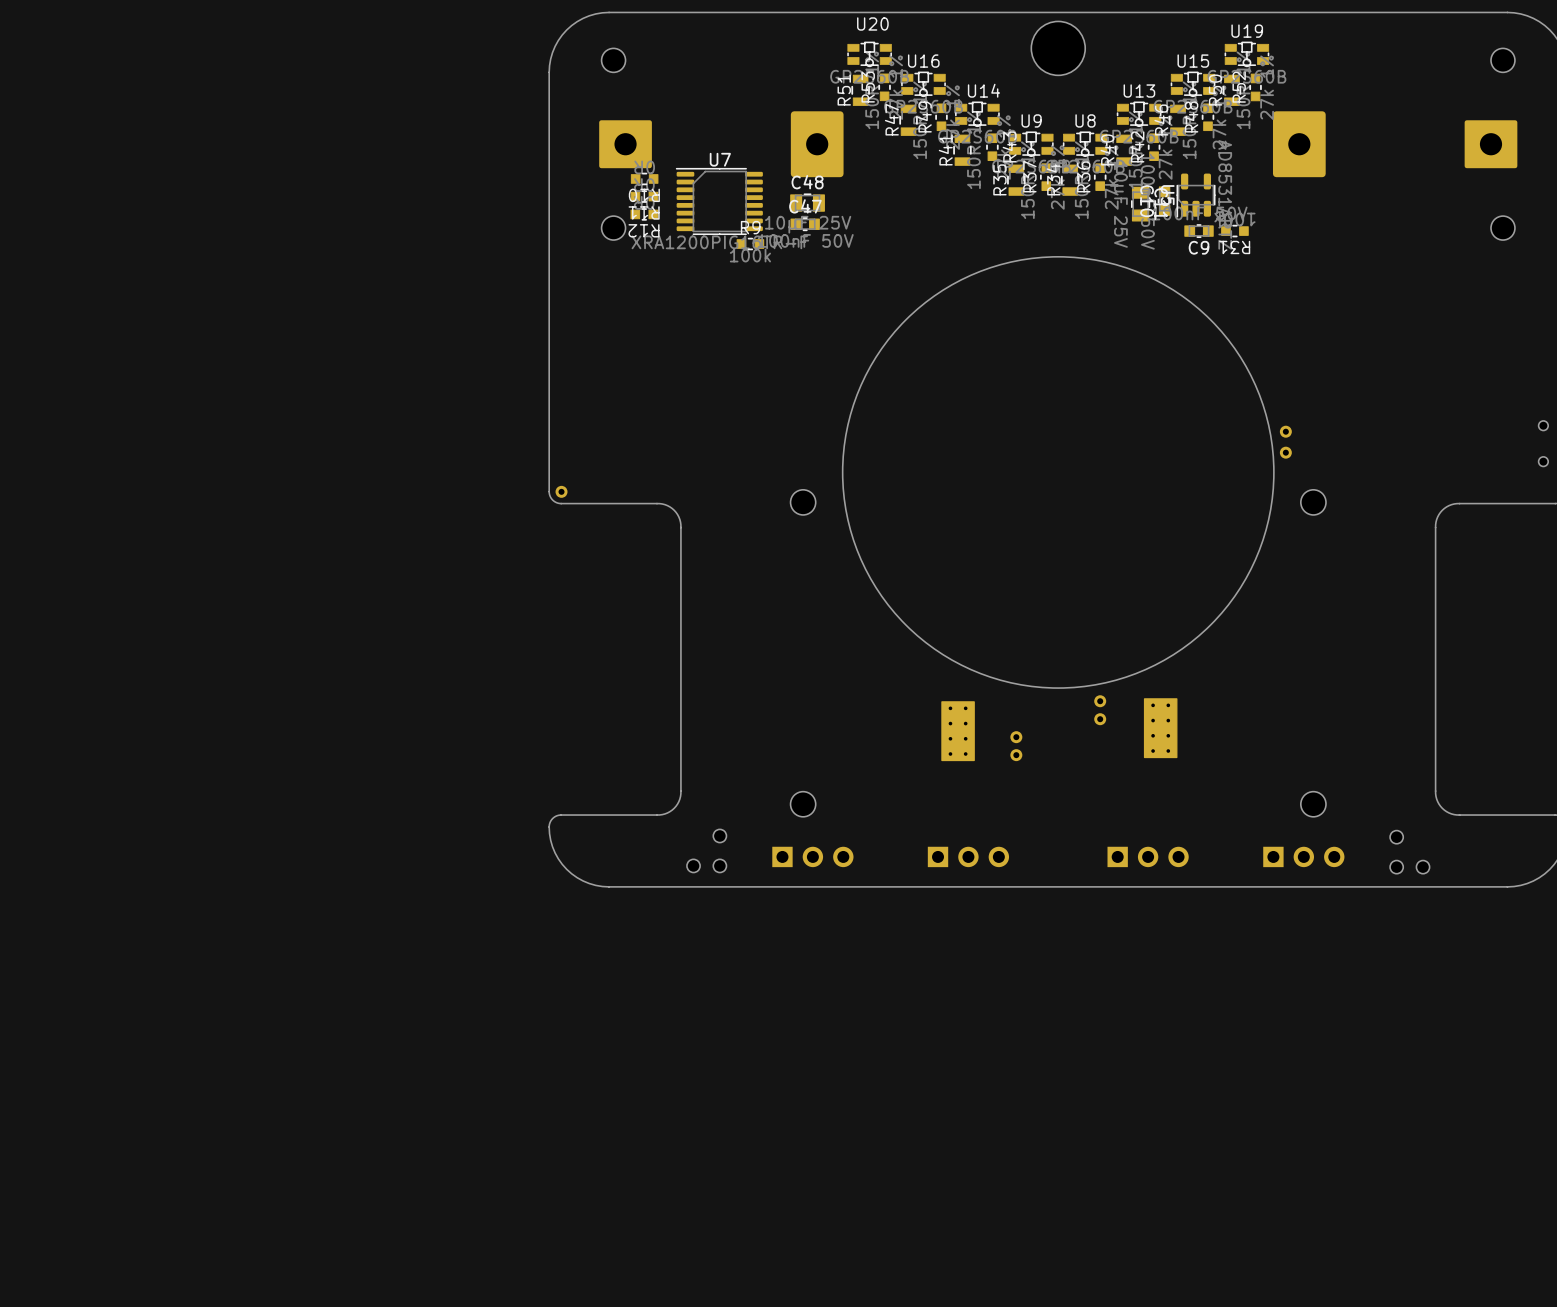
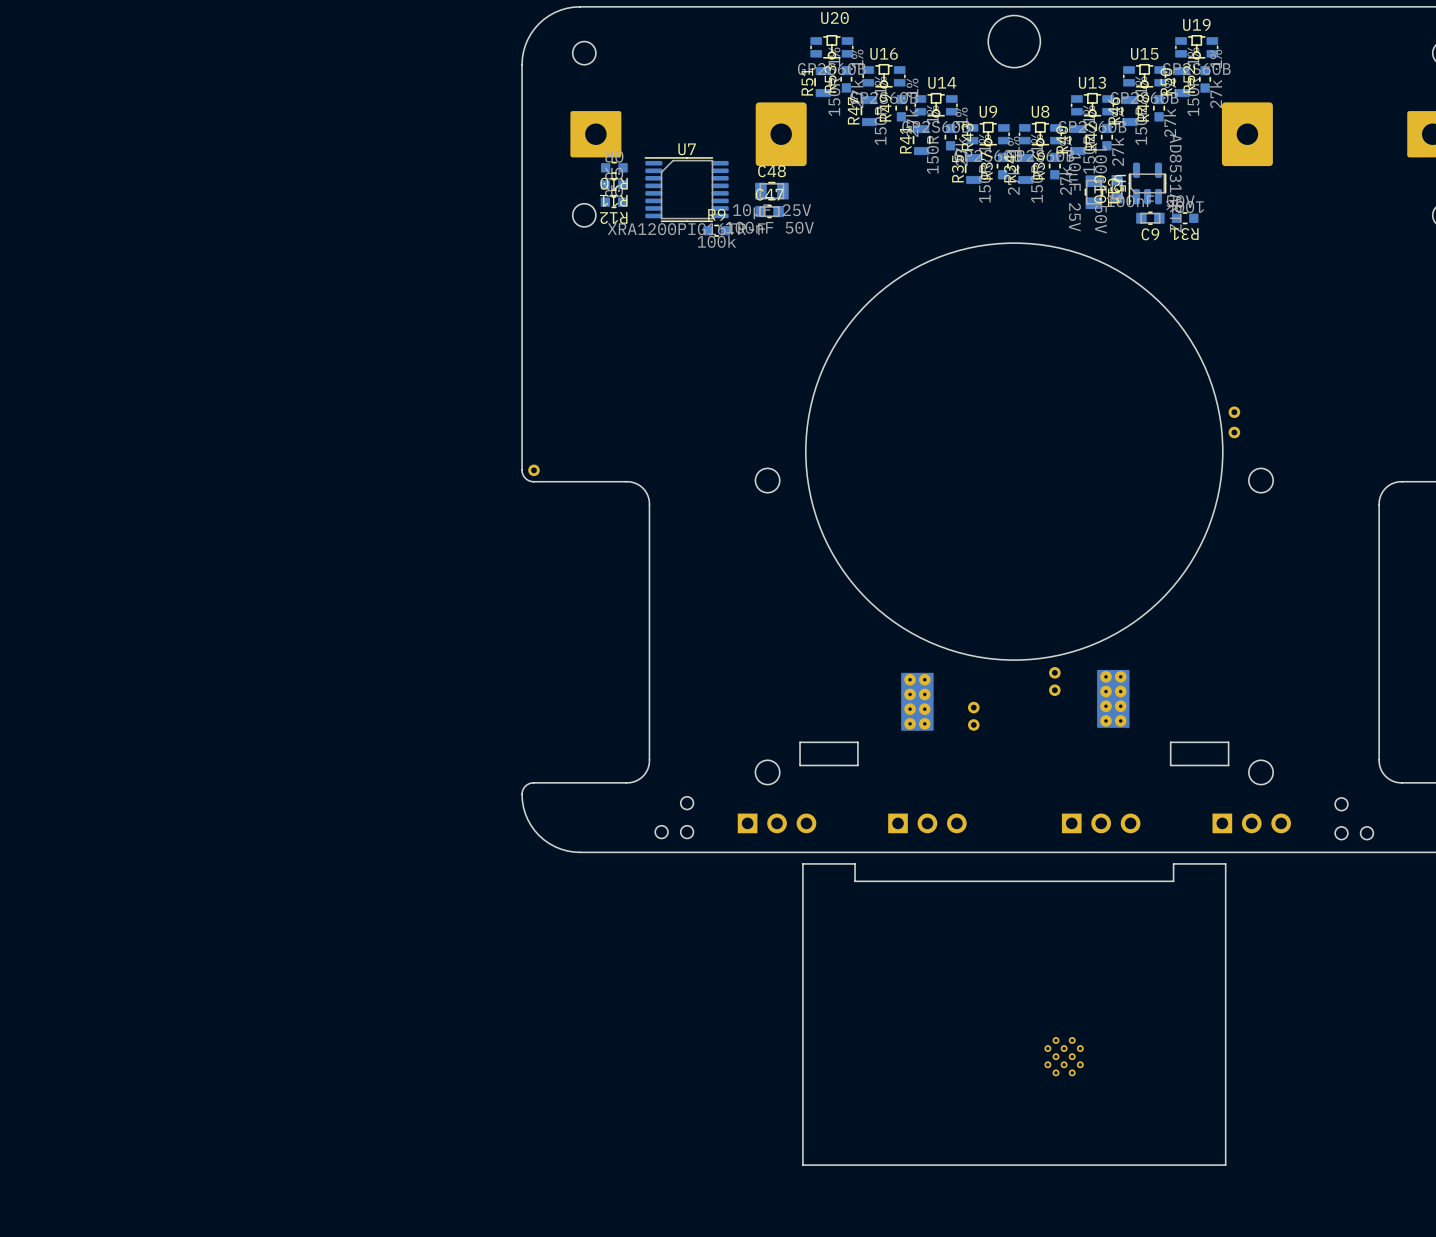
board edge: none -> (857, 742) (800, 742) (800, 765) (857, 765) (857, 742)
board edge: none -> (1228, 742) (1170, 742) (1170, 765) (1228, 765) (1228, 742)
board edge: none -> (1225, 863) (1225, 1165) (802, 1165) (802, 863) (855, 863) (855, 881) (1173, 881) (1173, 863) (1225, 863)
part: none -> (1064, 1056)

